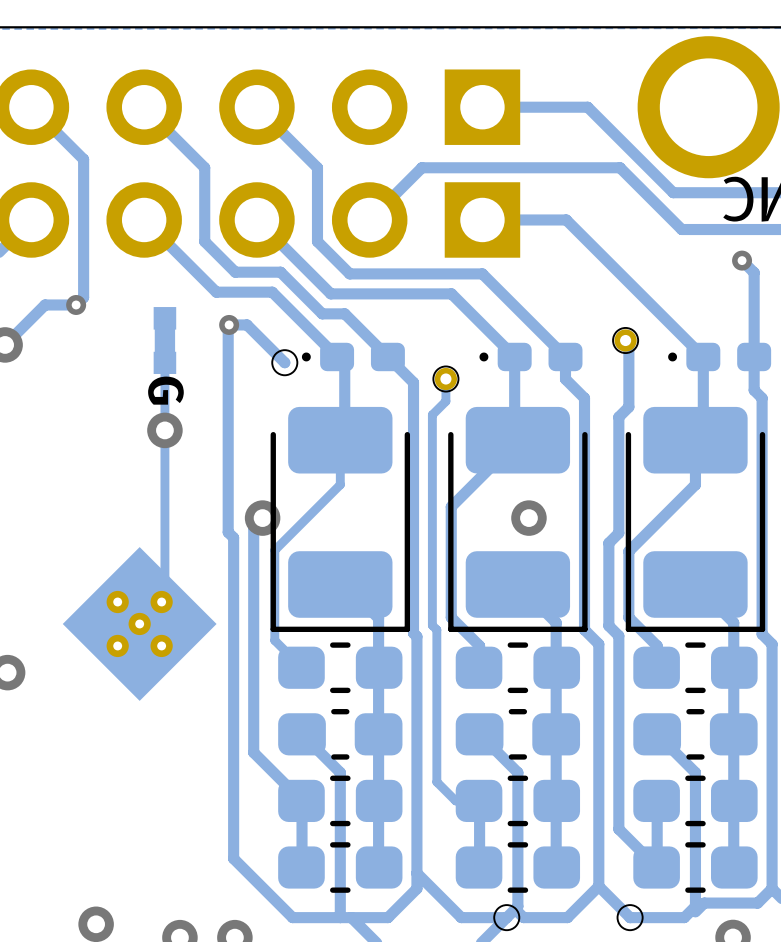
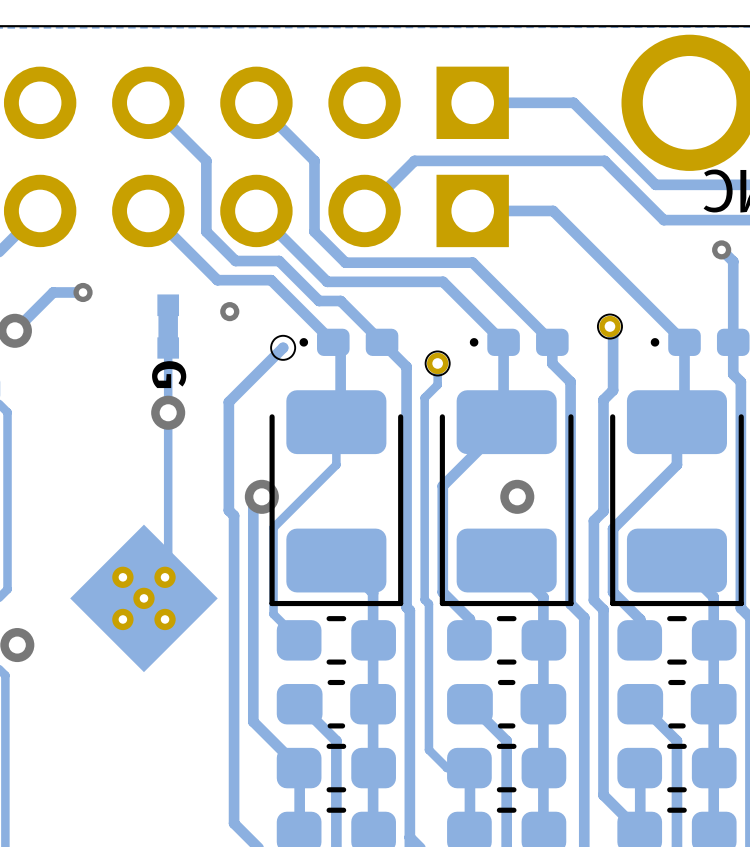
track: (31, 107) (83, 159) (83, 297) (76, 304) -> none
track: (284, 362) (247, 324) (229, 324) (228, 419) -> (283, 347) (228, 402)

